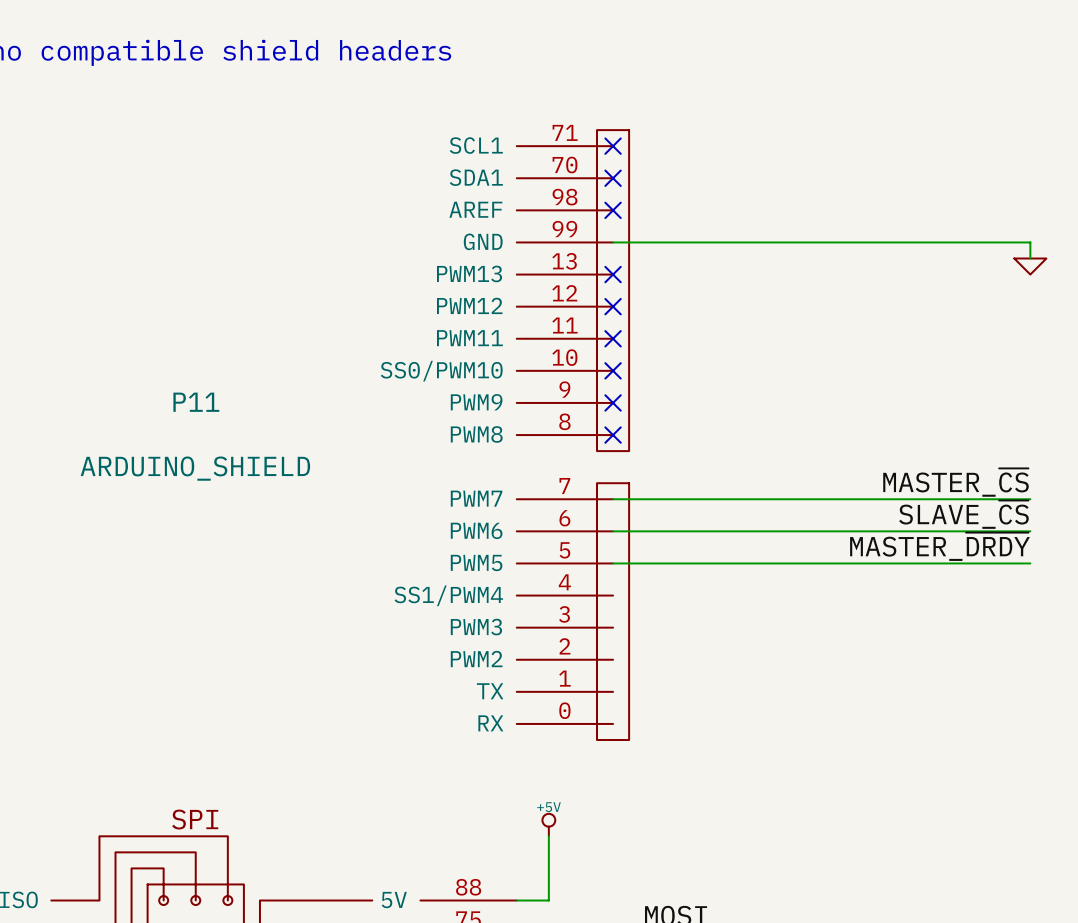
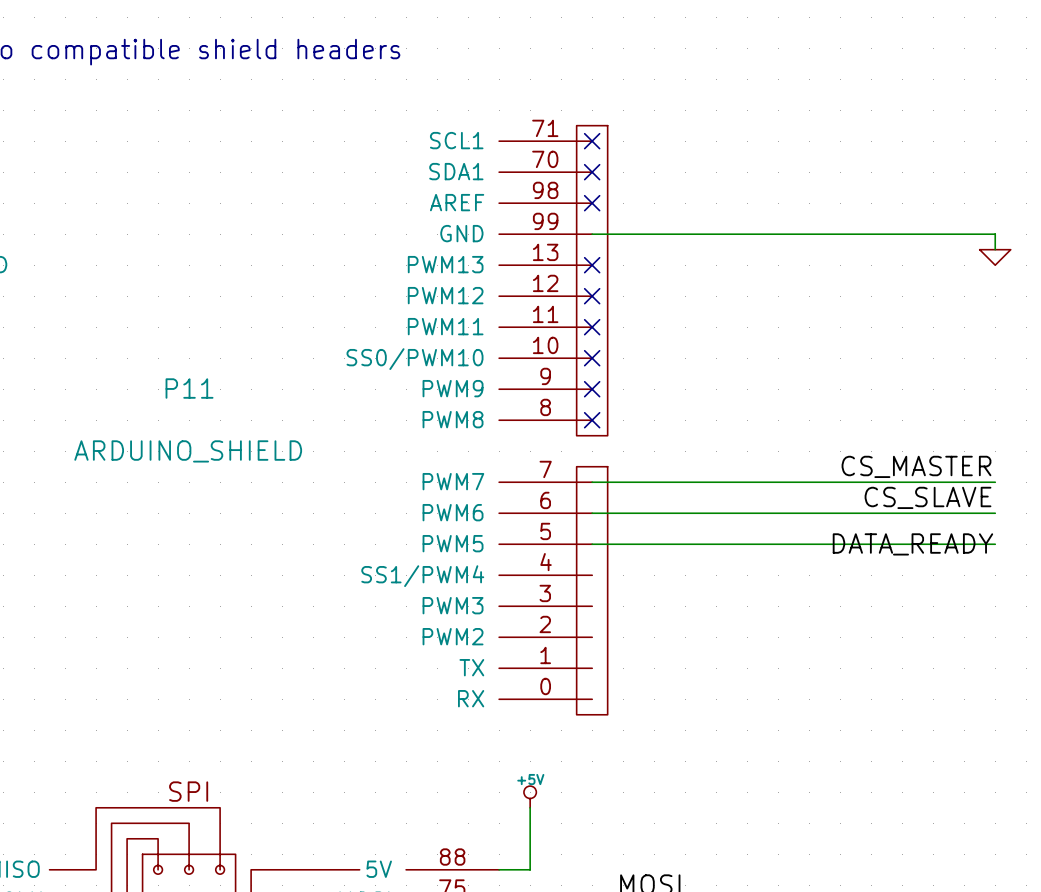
label: MASTER_~{CS} (955, 482) -> CS_MASTER (916, 466)
label: SLAVE_~{CS} (963, 514) -> CS_SLAVE (928, 497)
label: MASTER_~{DRDY} (940, 546) -> none
label: none -> DATA_READY (912, 544)

